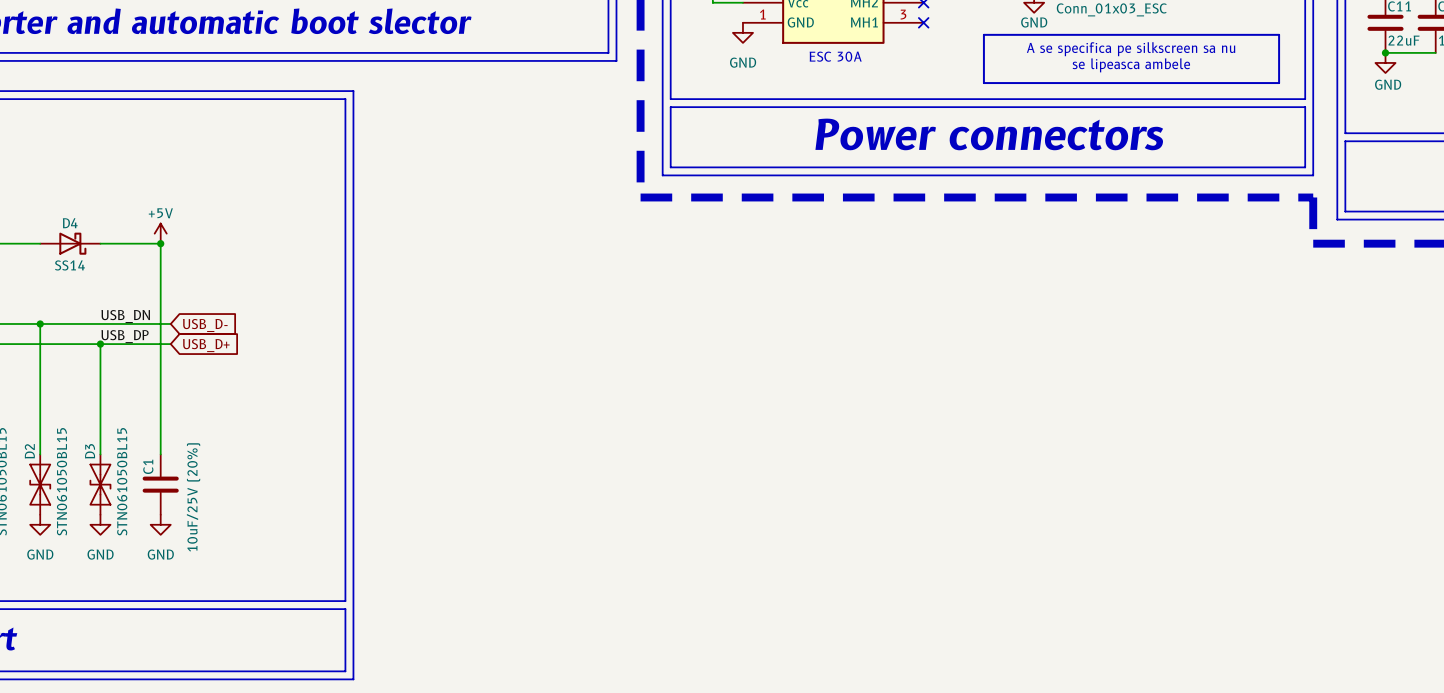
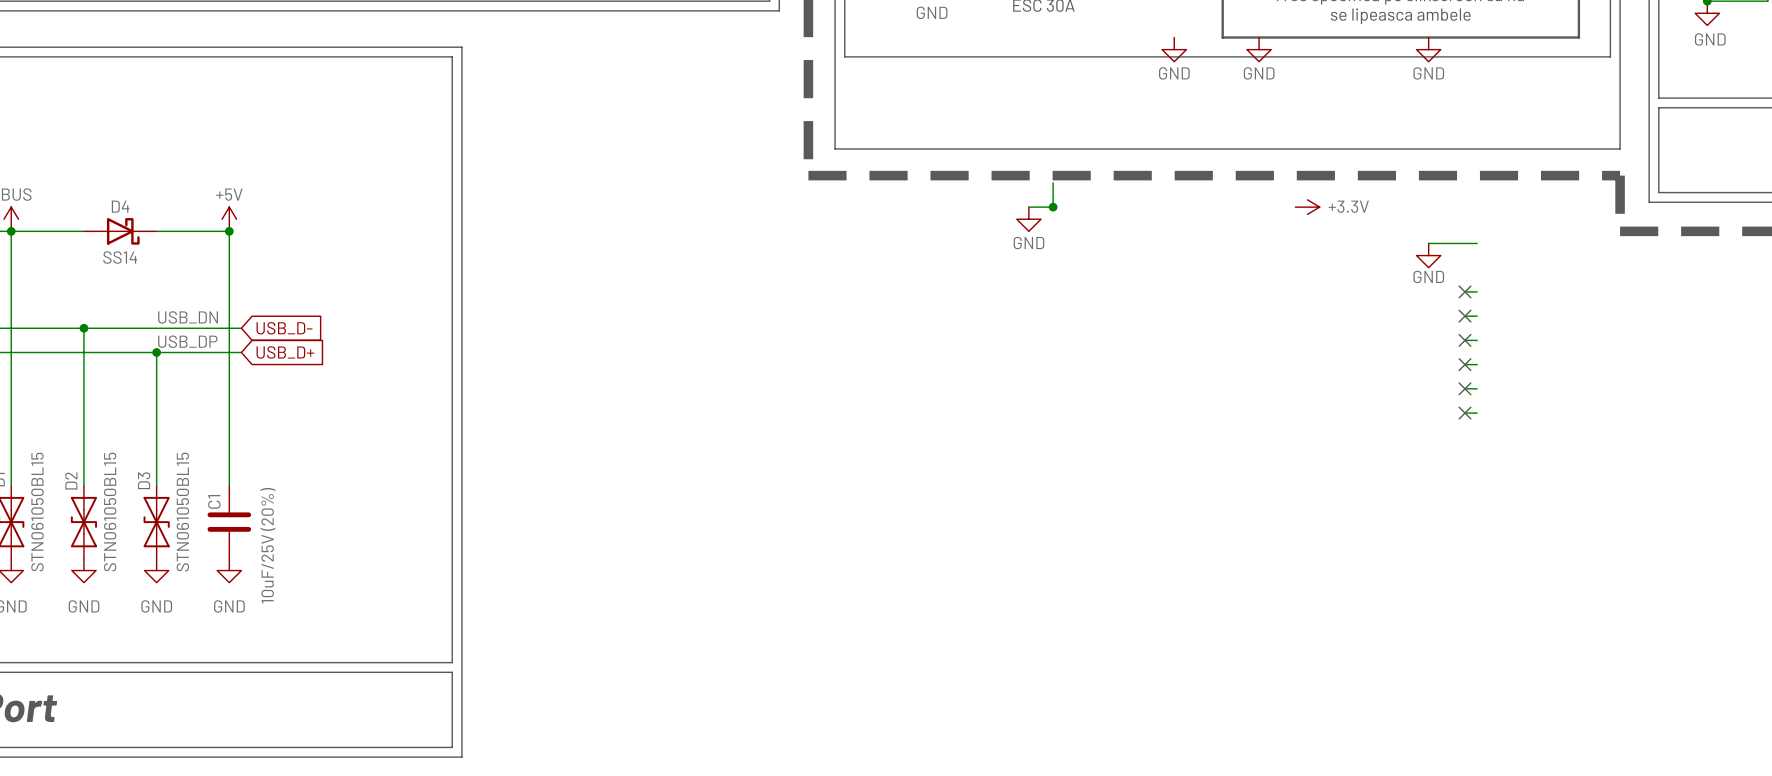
power symbol: none -> GND (1174, 49)
power symbol: none -> GND (1259, 49)
power symbol: none -> GND (1428, 49)
line: (670, 107) (670, 167) (1305, 167) (1305, 107) (670, 107) -> none
text: Power connectors (989, 134) -> none
wire: none -> (1053, 182) (1053, 207) (1028, 207)
junction: none -> (1053, 207)
power symbol: none -> +3.3V (1307, 207)
power symbol: none -> GND (1028, 219)
wire: none -> (1428, 243) (1477, 243)
power symbol: none -> GND (1428, 255)
wire: none -> (1465, 291) (1477, 291)
no-connect mark: none -> (1465, 291)
wire: none -> (1465, 316) (1477, 316)
no-connect mark: none -> (1465, 316)
wire: none -> (1465, 340) (1477, 340)
no-connect mark: none -> (1465, 340)
wire: none -> (1465, 364) (1477, 364)
no-connect mark: none -> (1465, 364)
wire: none -> (1465, 388) (1477, 388)
no-connect mark: none -> (1465, 388)
wire: none -> (1465, 413) (1477, 413)
no-connect mark: none -> (1465, 413)

